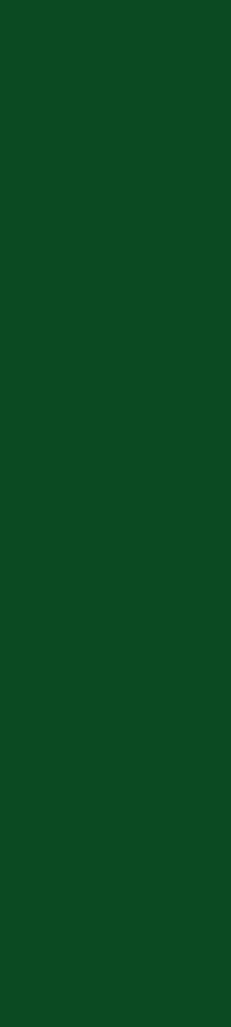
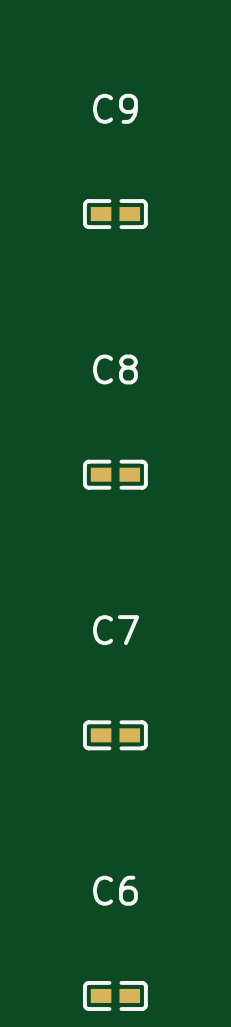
C9: none -> (115, 214)
C8: none -> (115, 474)
C7: none -> (115, 735)
C6: none -> (115, 995)

